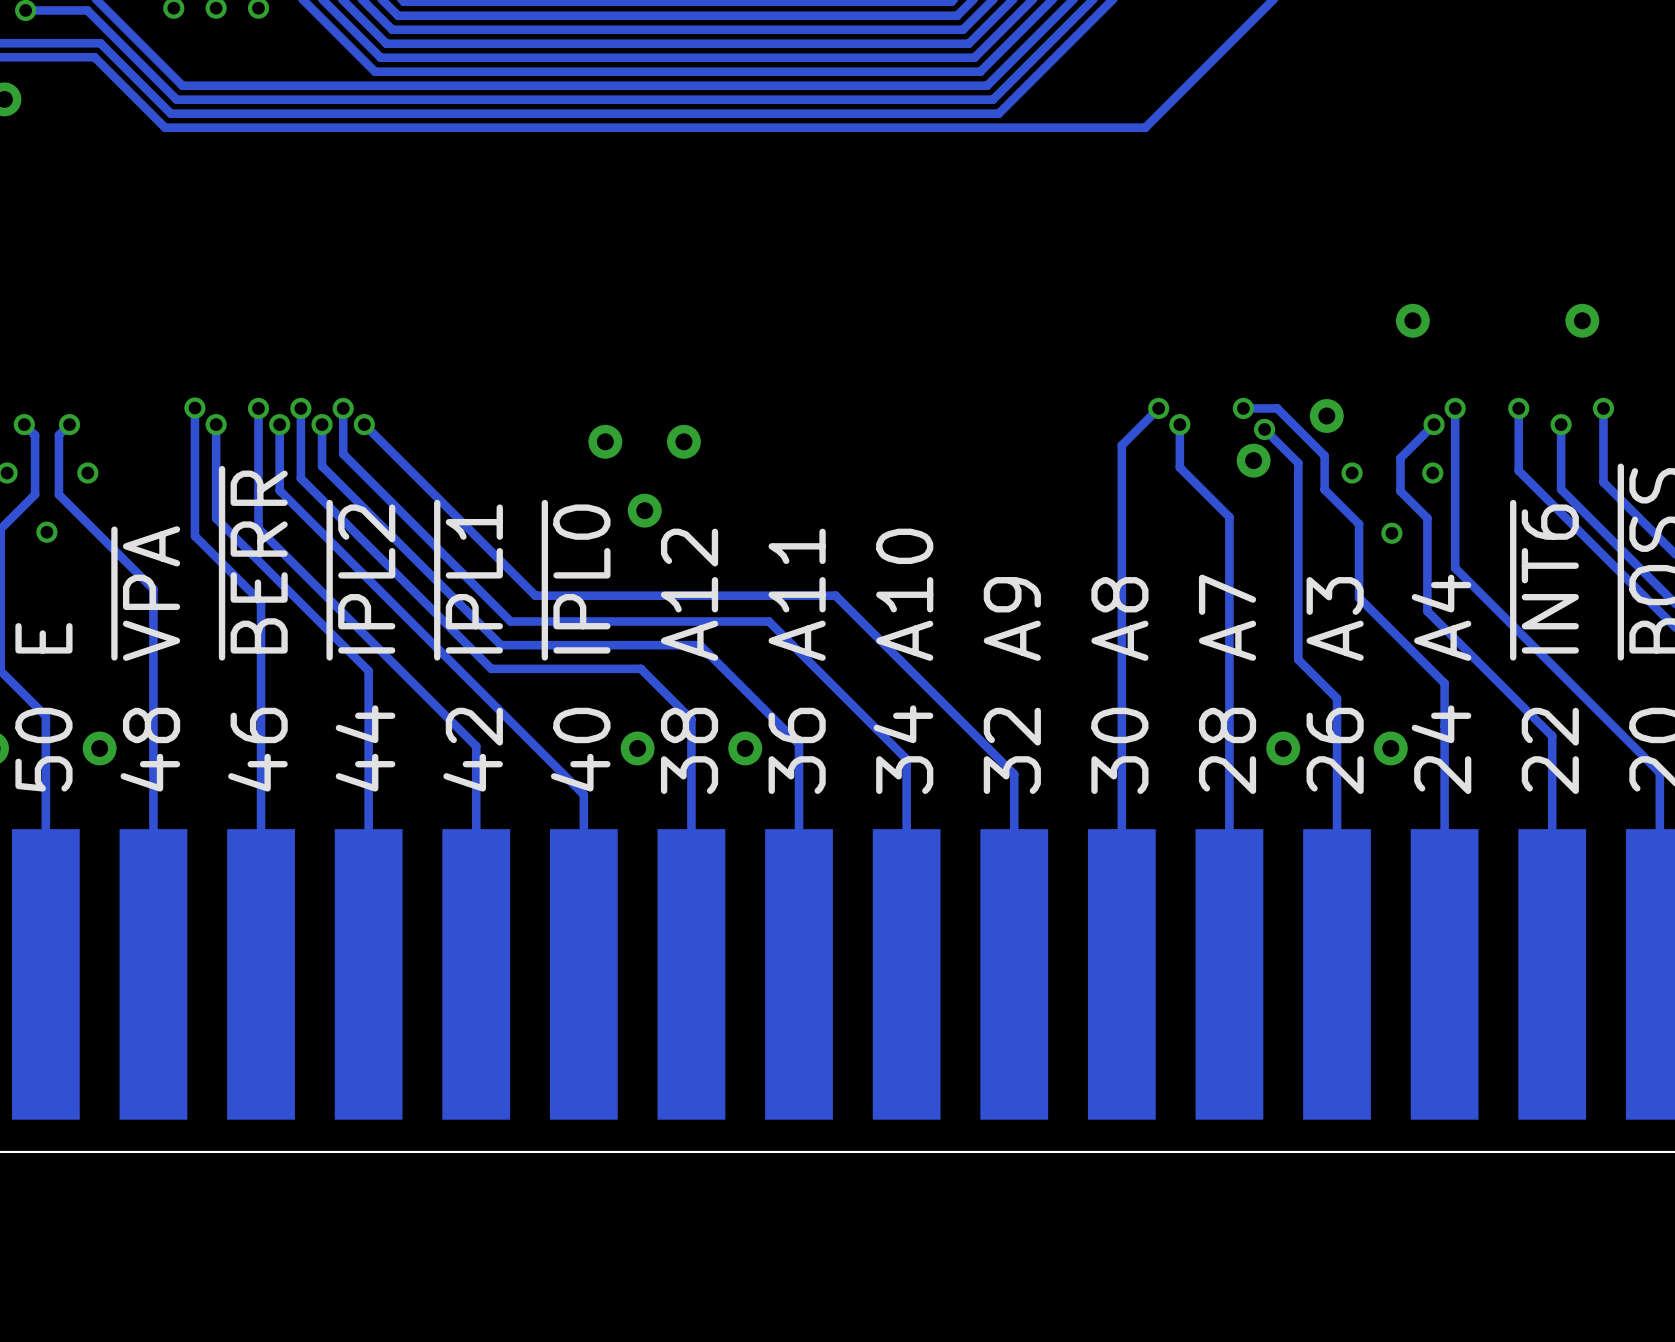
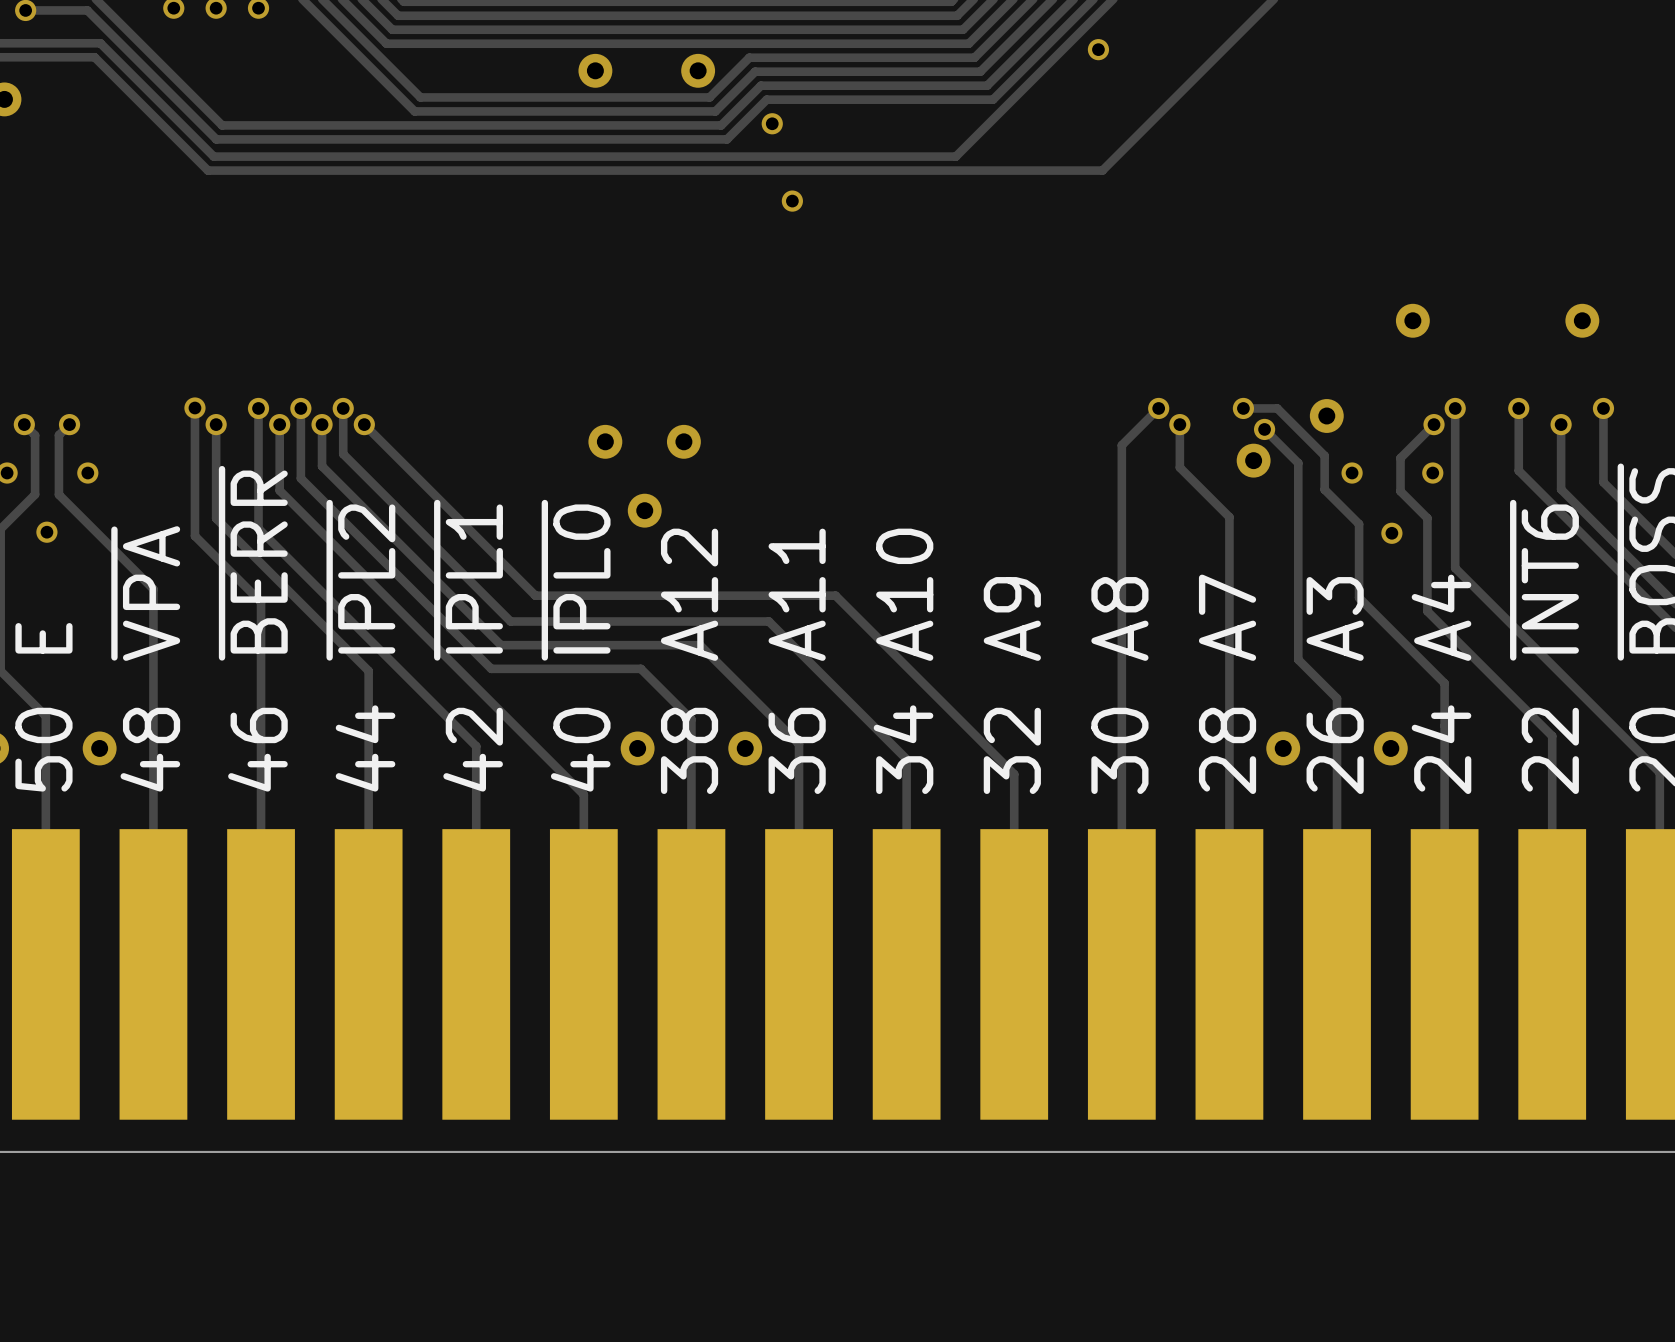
track: (100, 43) (170, 113) (998, 113) -> (100, 43) (213, 156) (955, 156) (998, 113)
via: none -> (1098, 49)
track: (94, 57) (165, 127) (1145, 127) -> (94, 57) (207, 170) (1102, 170) (1145, 127)
track: (749, 57) (380, 57) -> (749, 57) (709, 97) (420, 97) (380, 57)
via: none -> (595, 70)
via: none -> (698, 70)
track: (755, 71) (374, 71) -> (755, 71) (715, 111) (414, 111) (374, 71)
track: (760, 85) (182, 85) -> (760, 85) (721, 125) (222, 125) (182, 85)
track: (766, 99) (176, 99) -> (766, 99) (727, 139) (216, 139) (176, 99)
via: none -> (772, 123)
via: none -> (792, 201)

